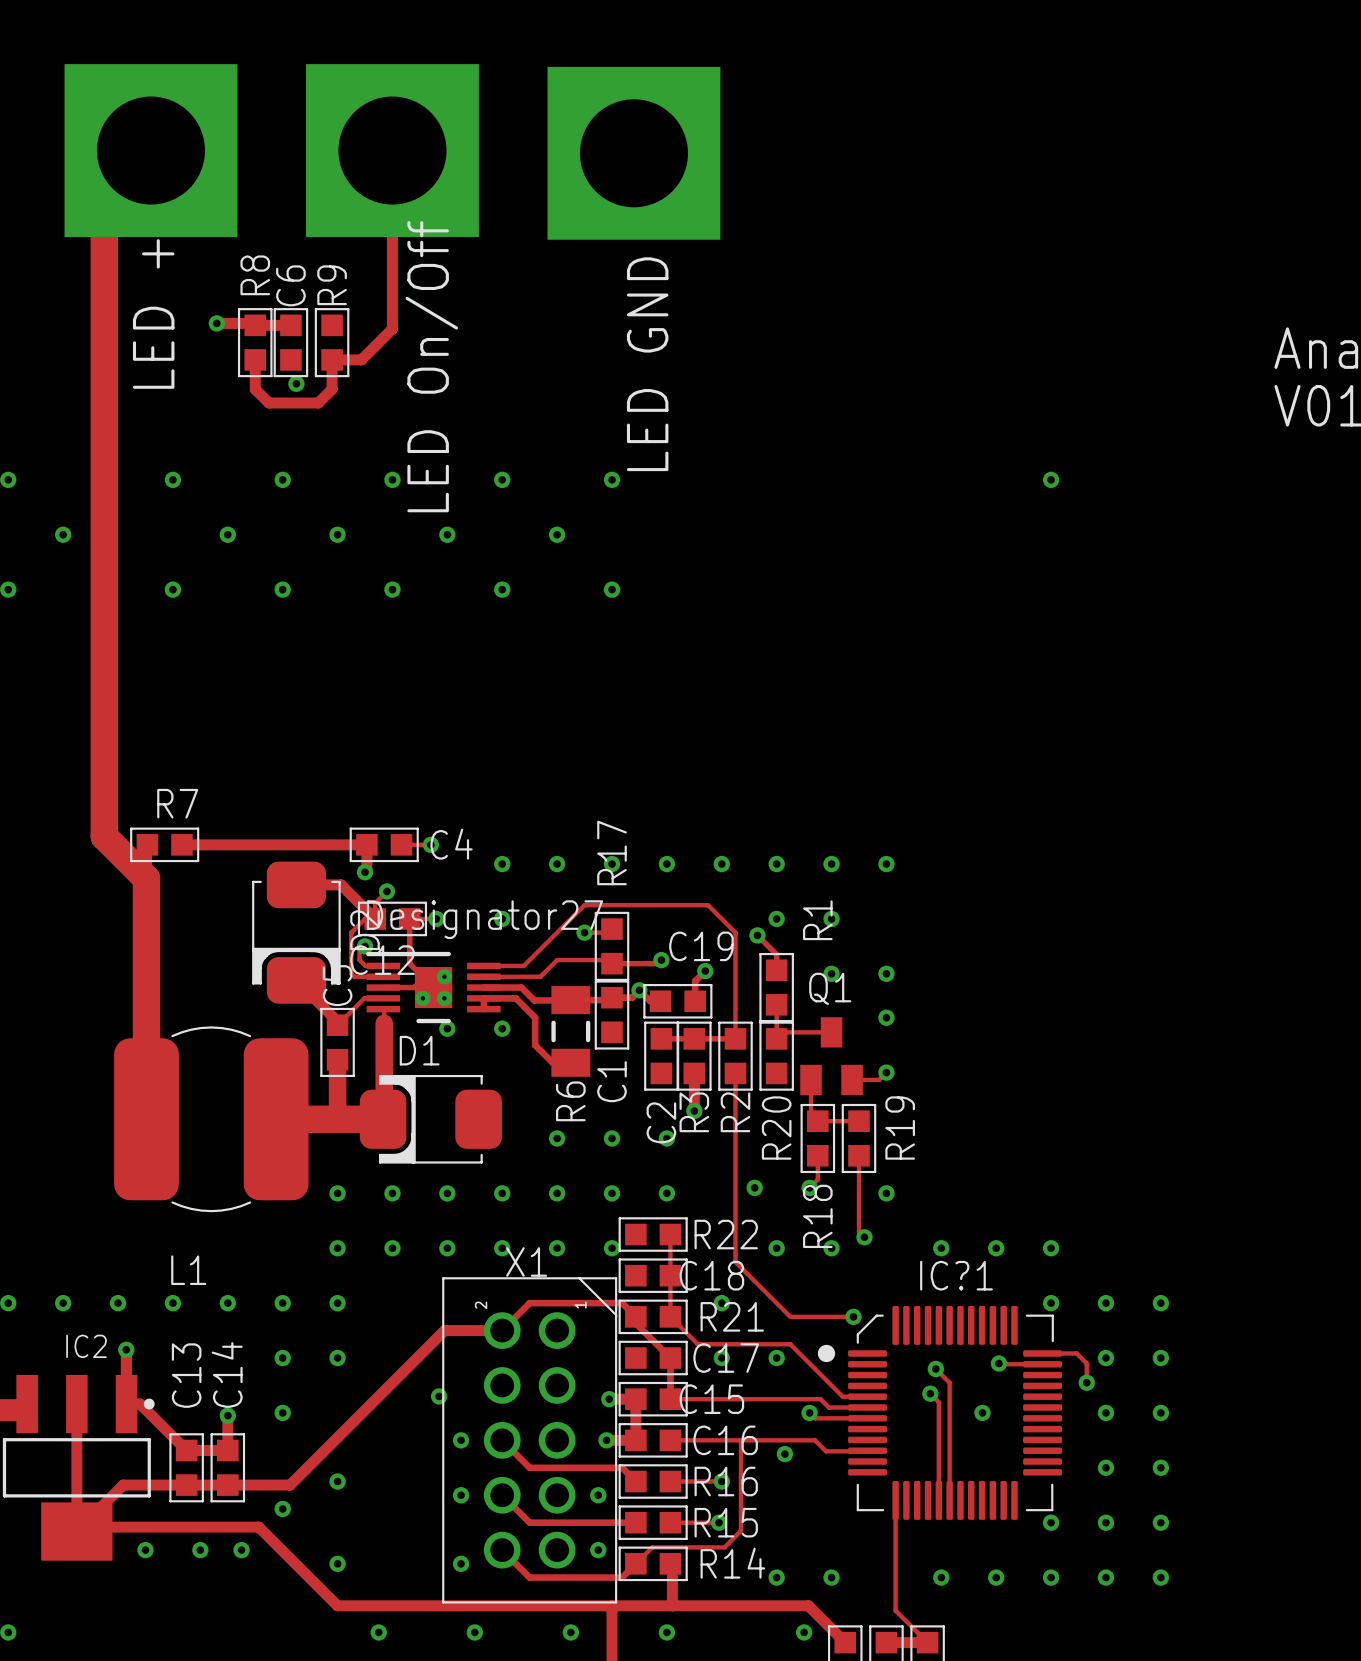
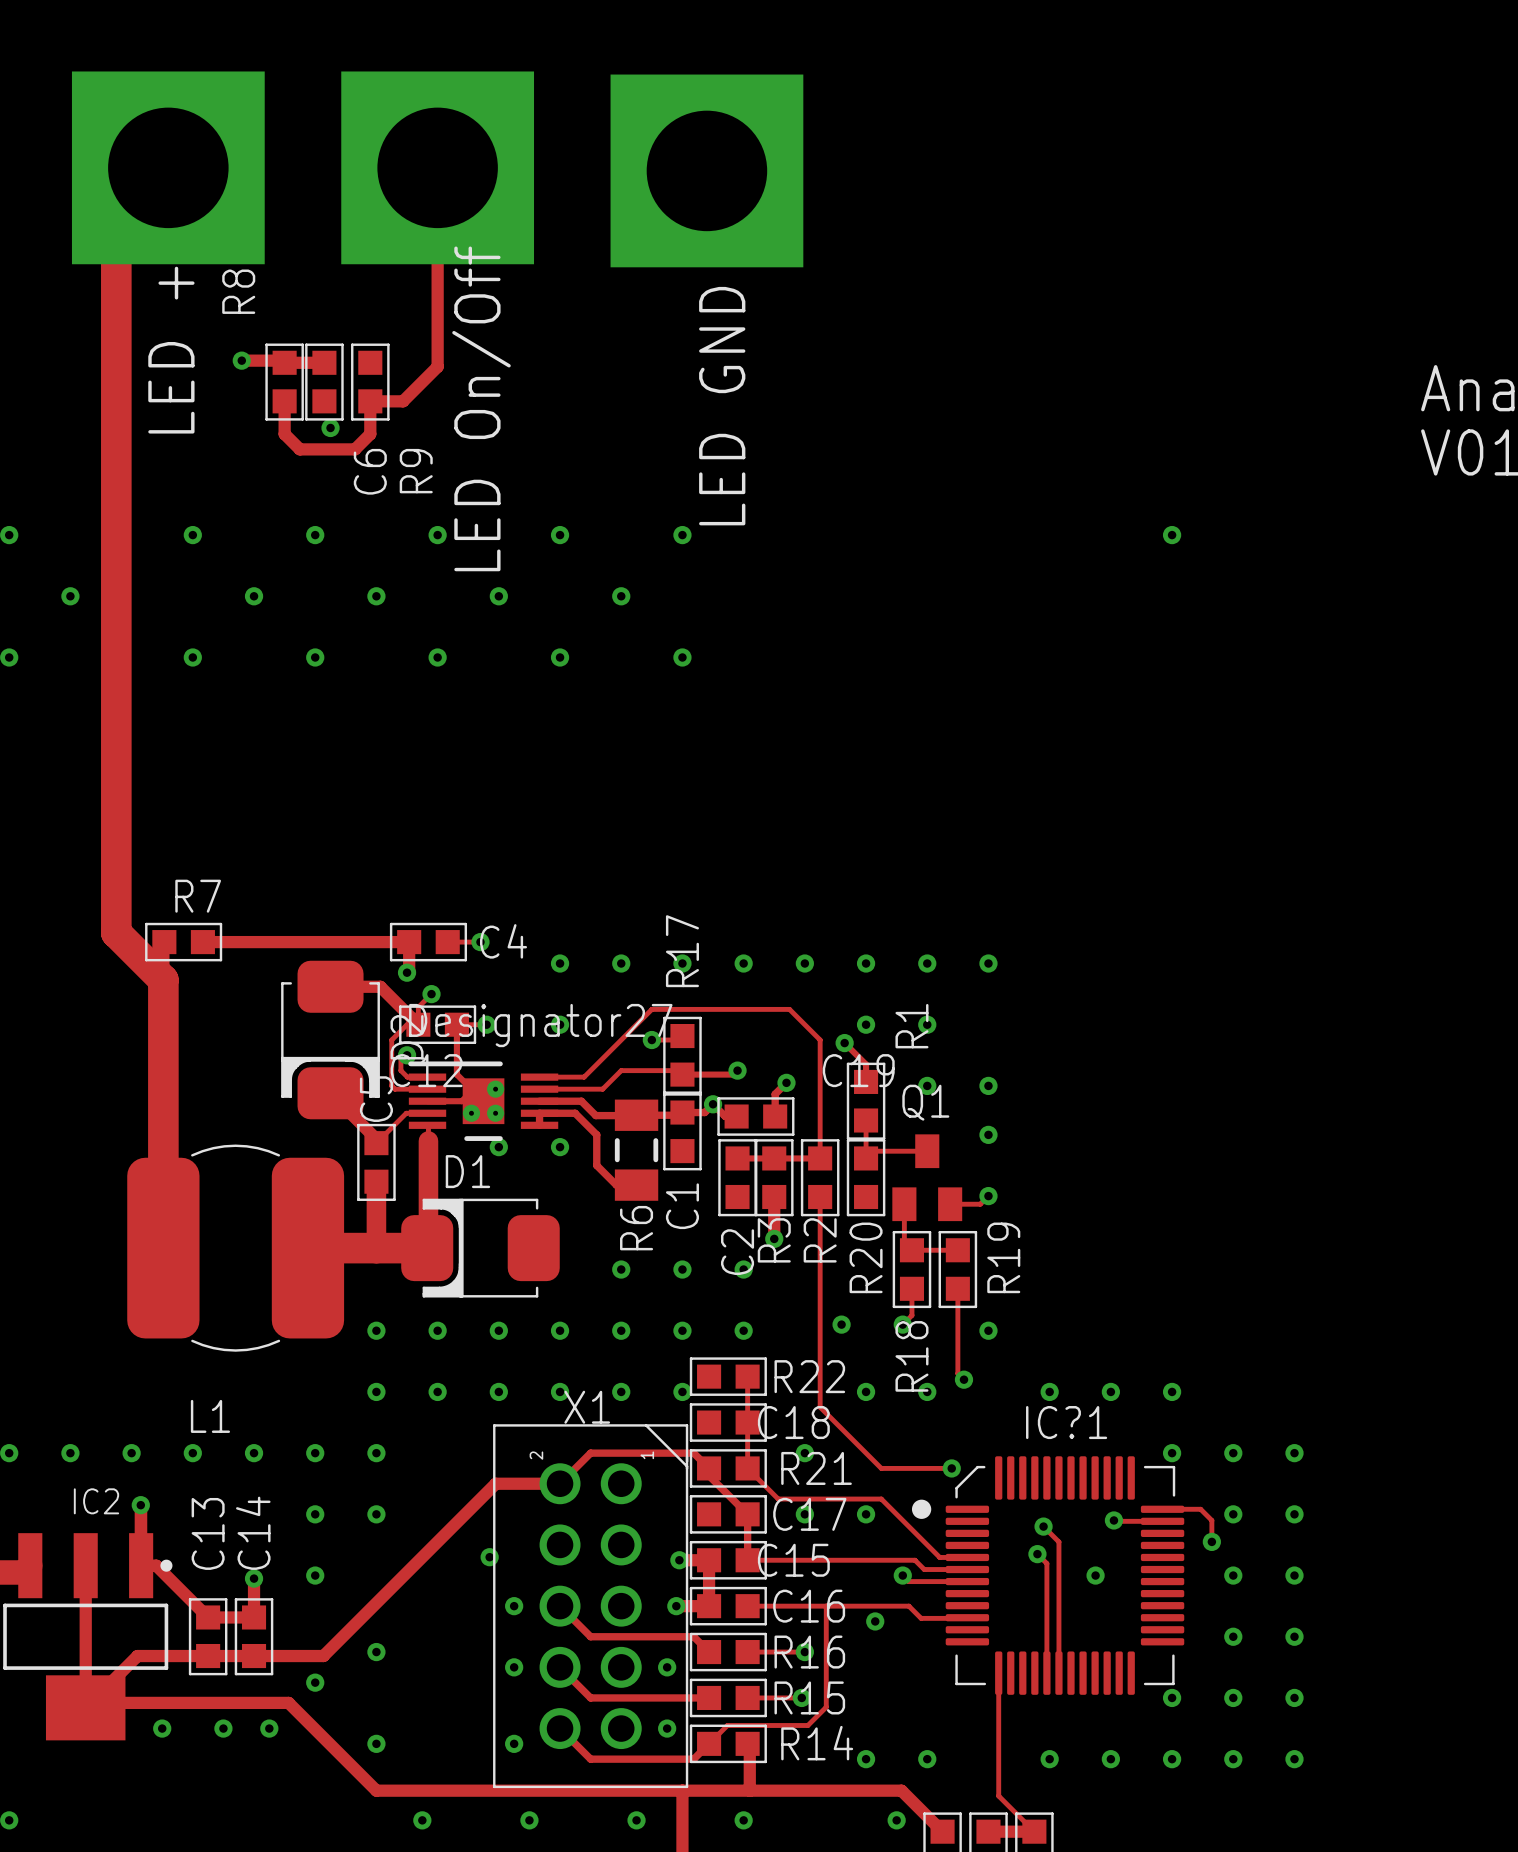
R8 name position: R8 (255, 275) -> R8 (238, 291)
C6 name position: C6 (290, 285) -> C6 (370, 471)
R9 name position: R9 (332, 285) -> R9 (416, 471)
C19 name position: C19 (701, 946) -> C19 (858, 1070)

